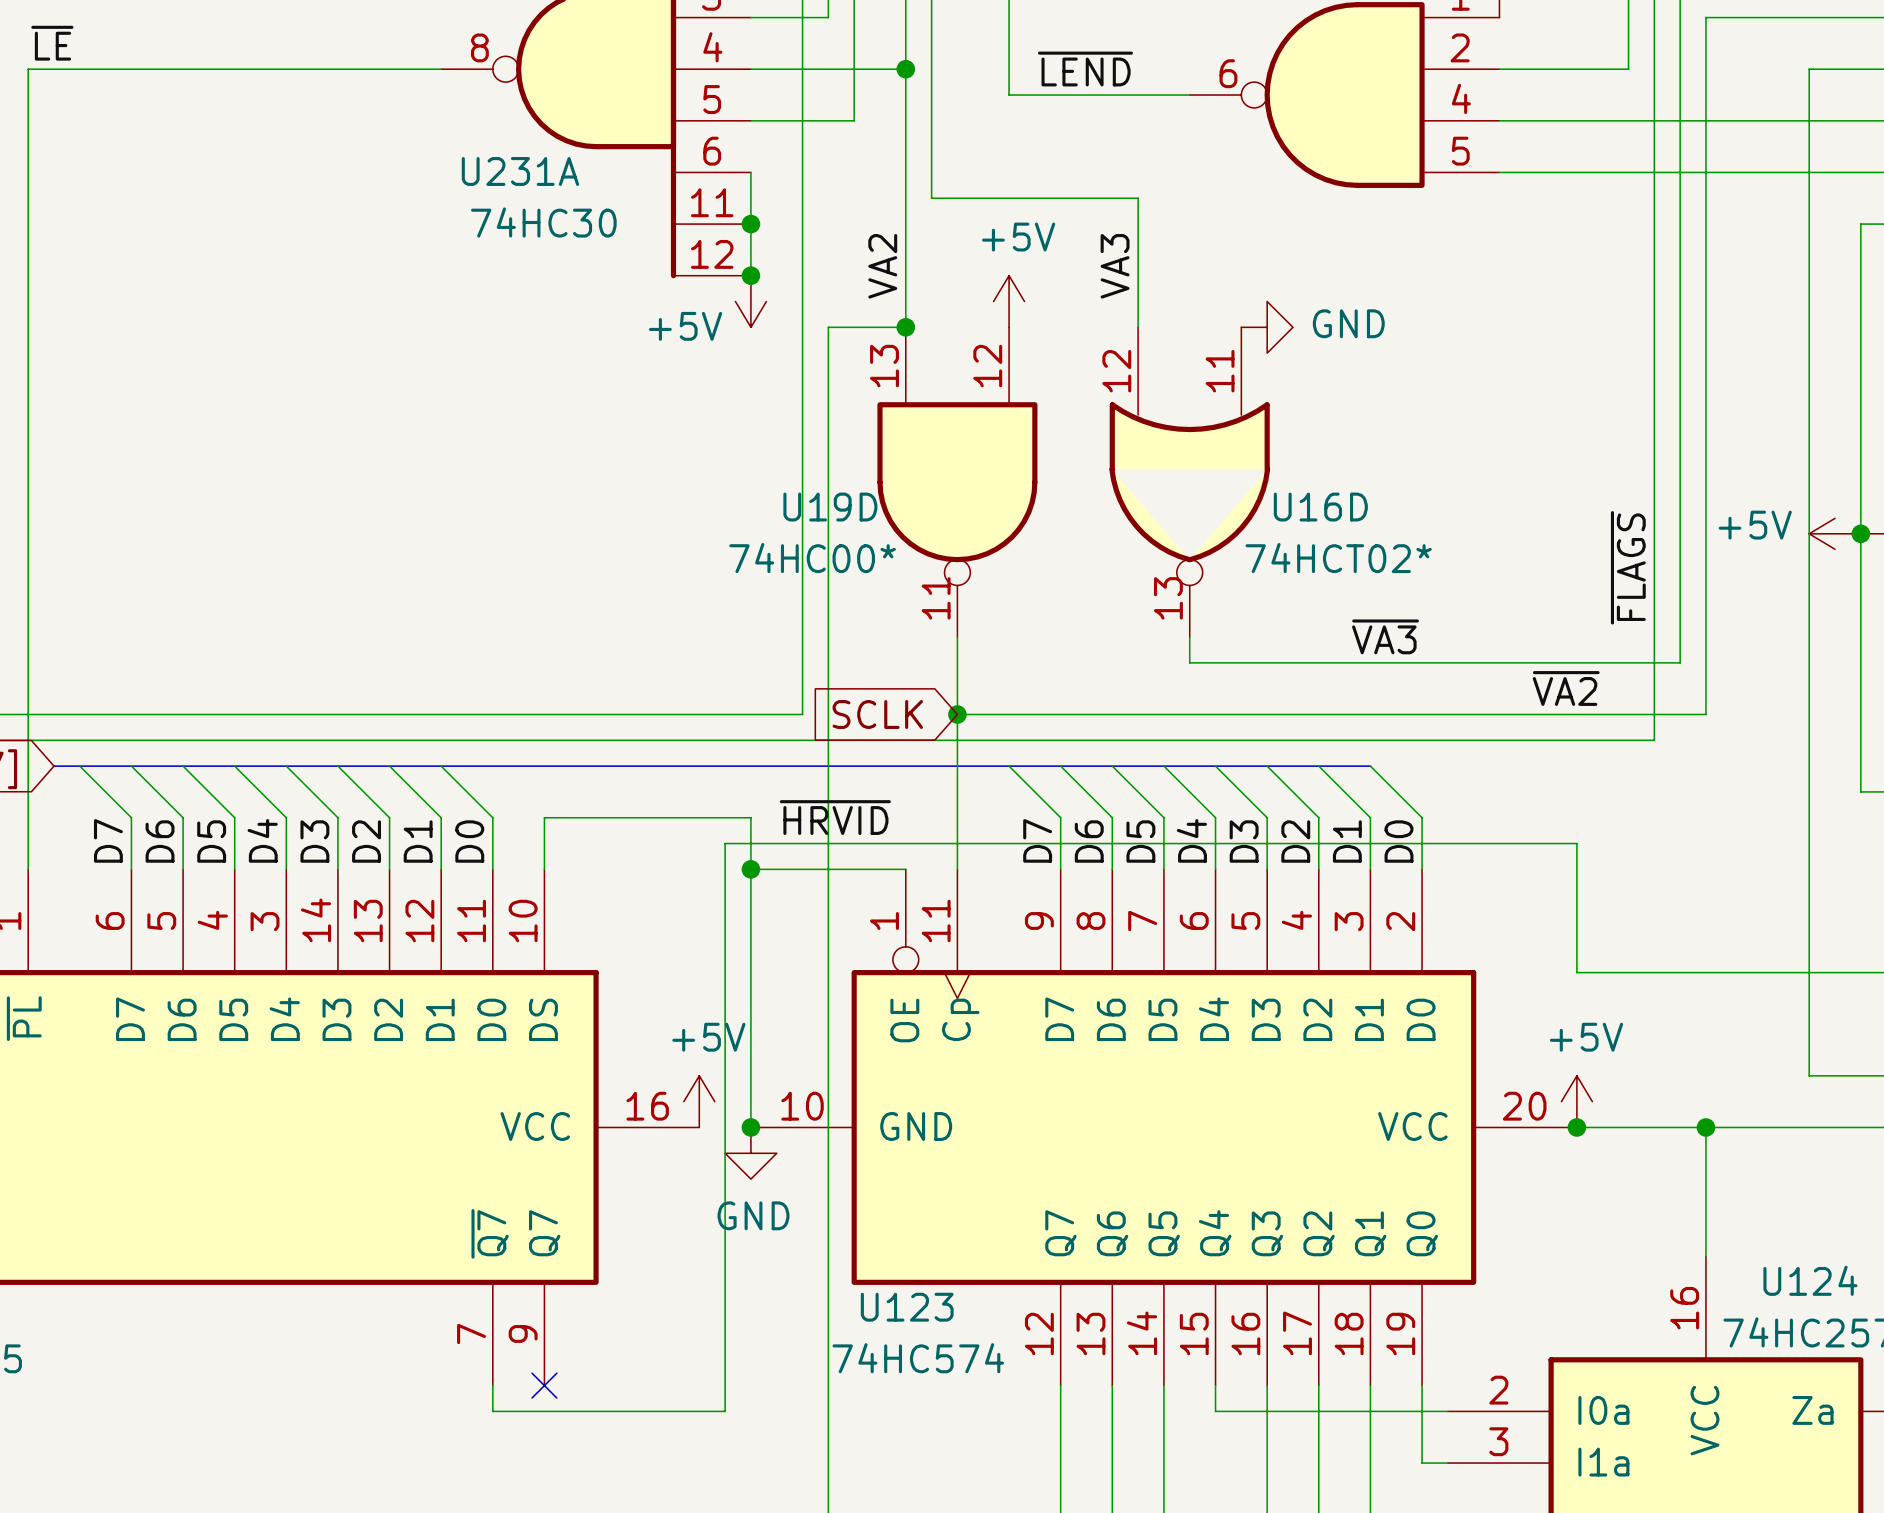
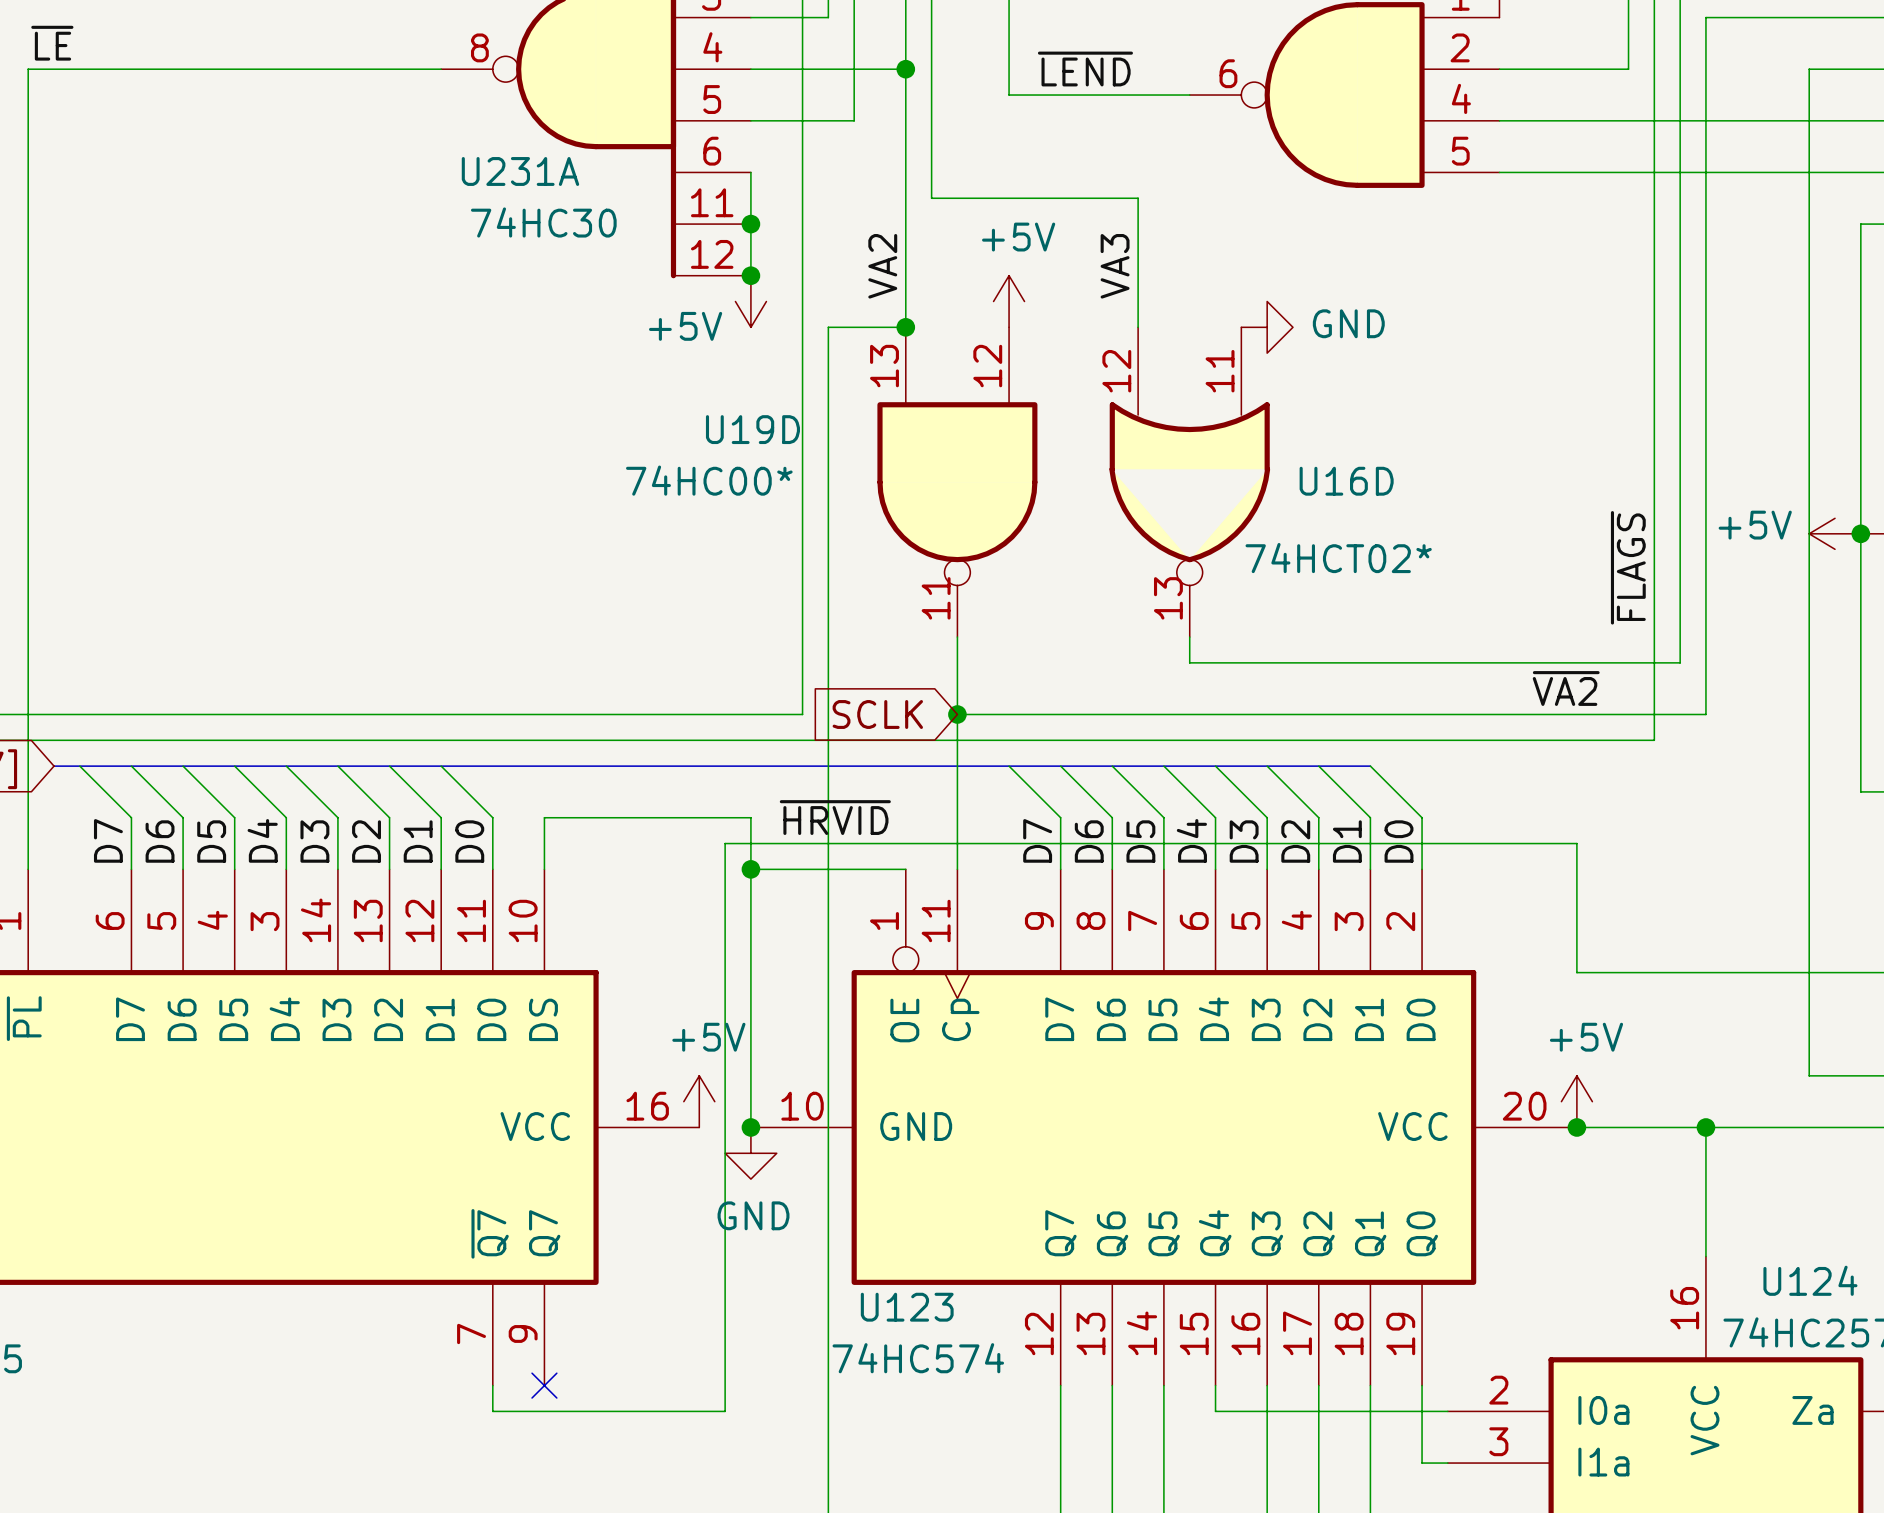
U19D name position: U19D (830, 507) -> U19D (752, 429)
U16D name position: U16D (1320, 507) -> U16D (1346, 481)
U19D value position: 74HC00* (812, 558) -> 74HC00* (709, 480)
label: ~{VA3} (1385, 636) -> none

